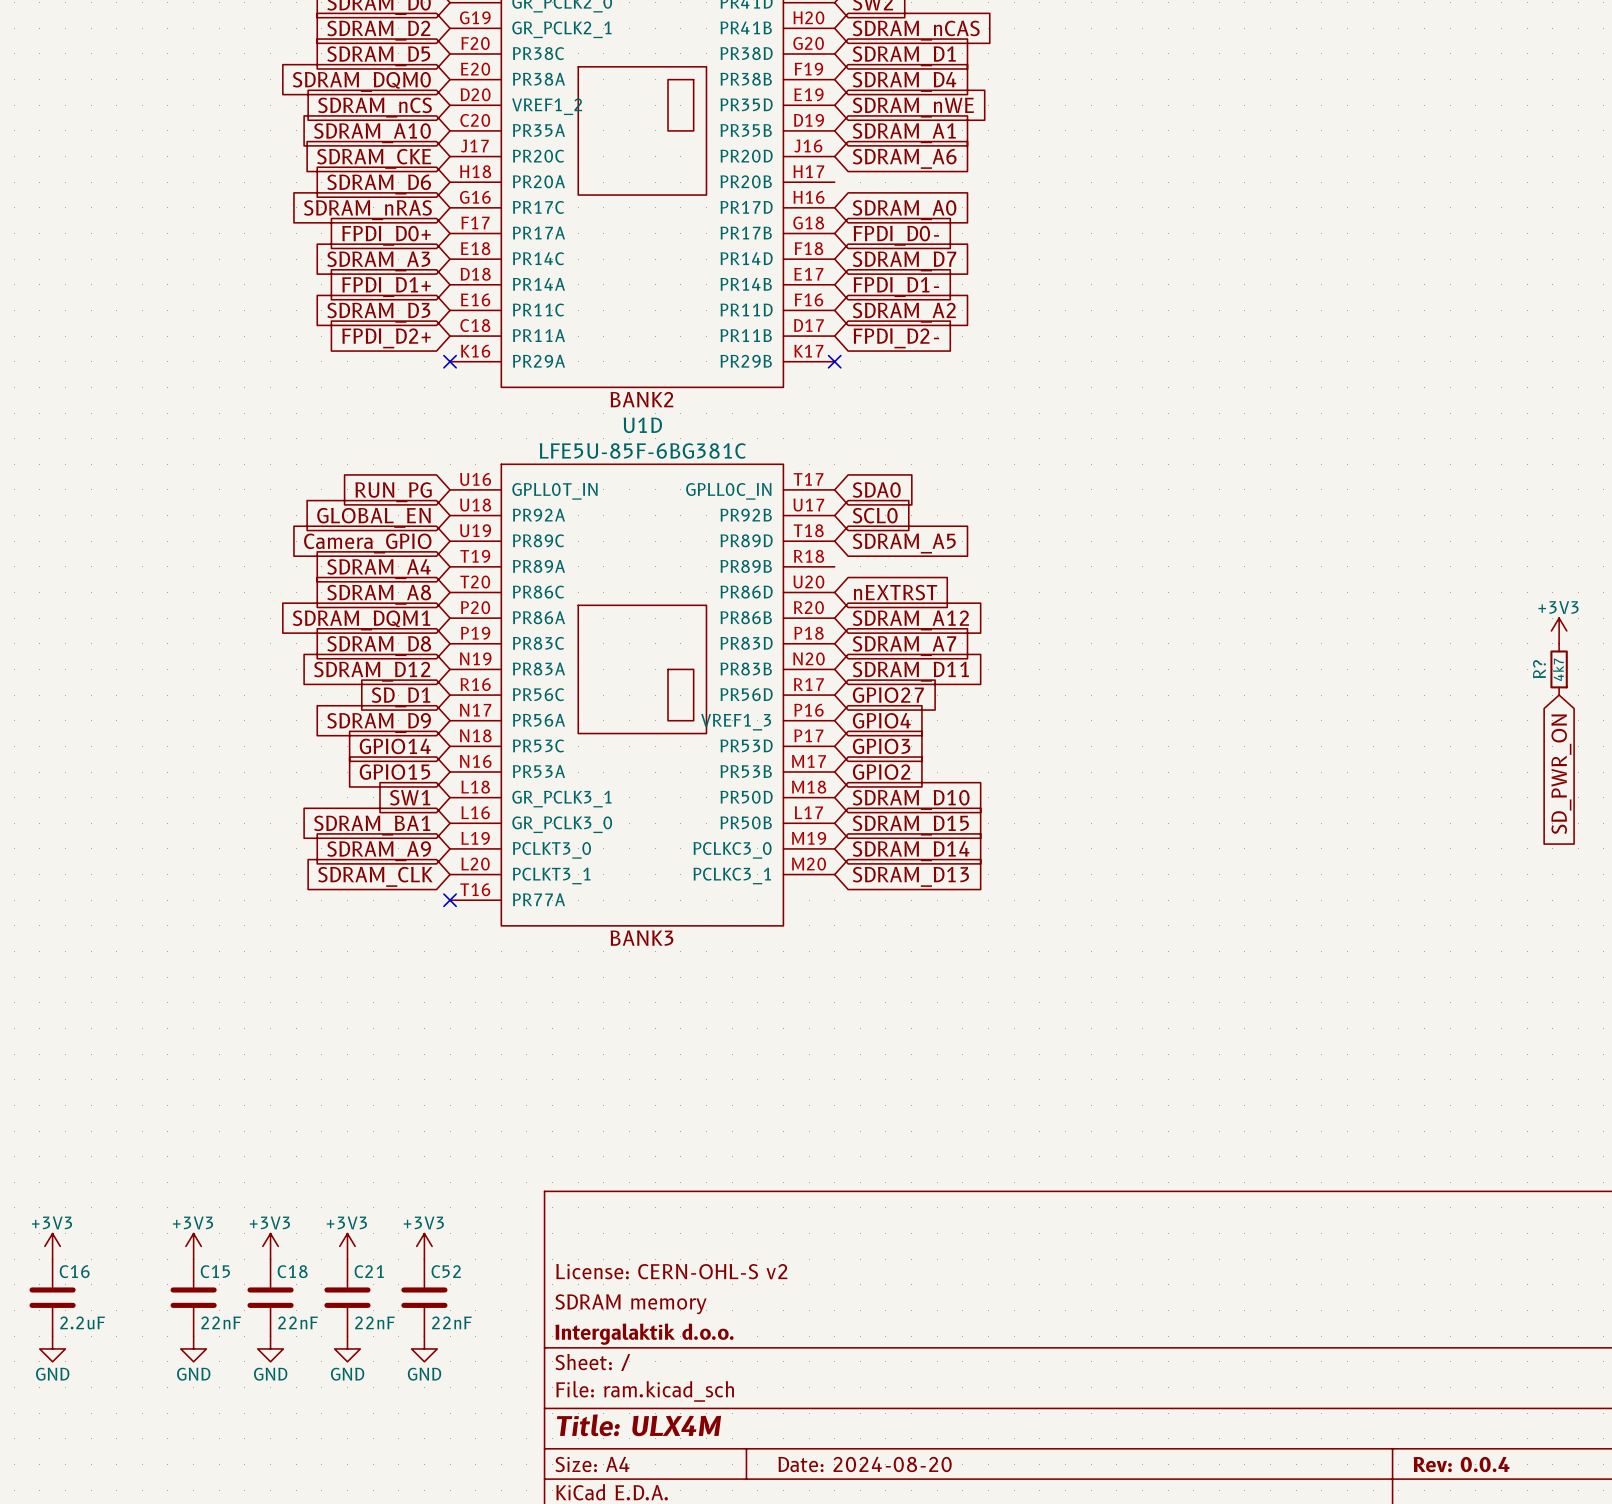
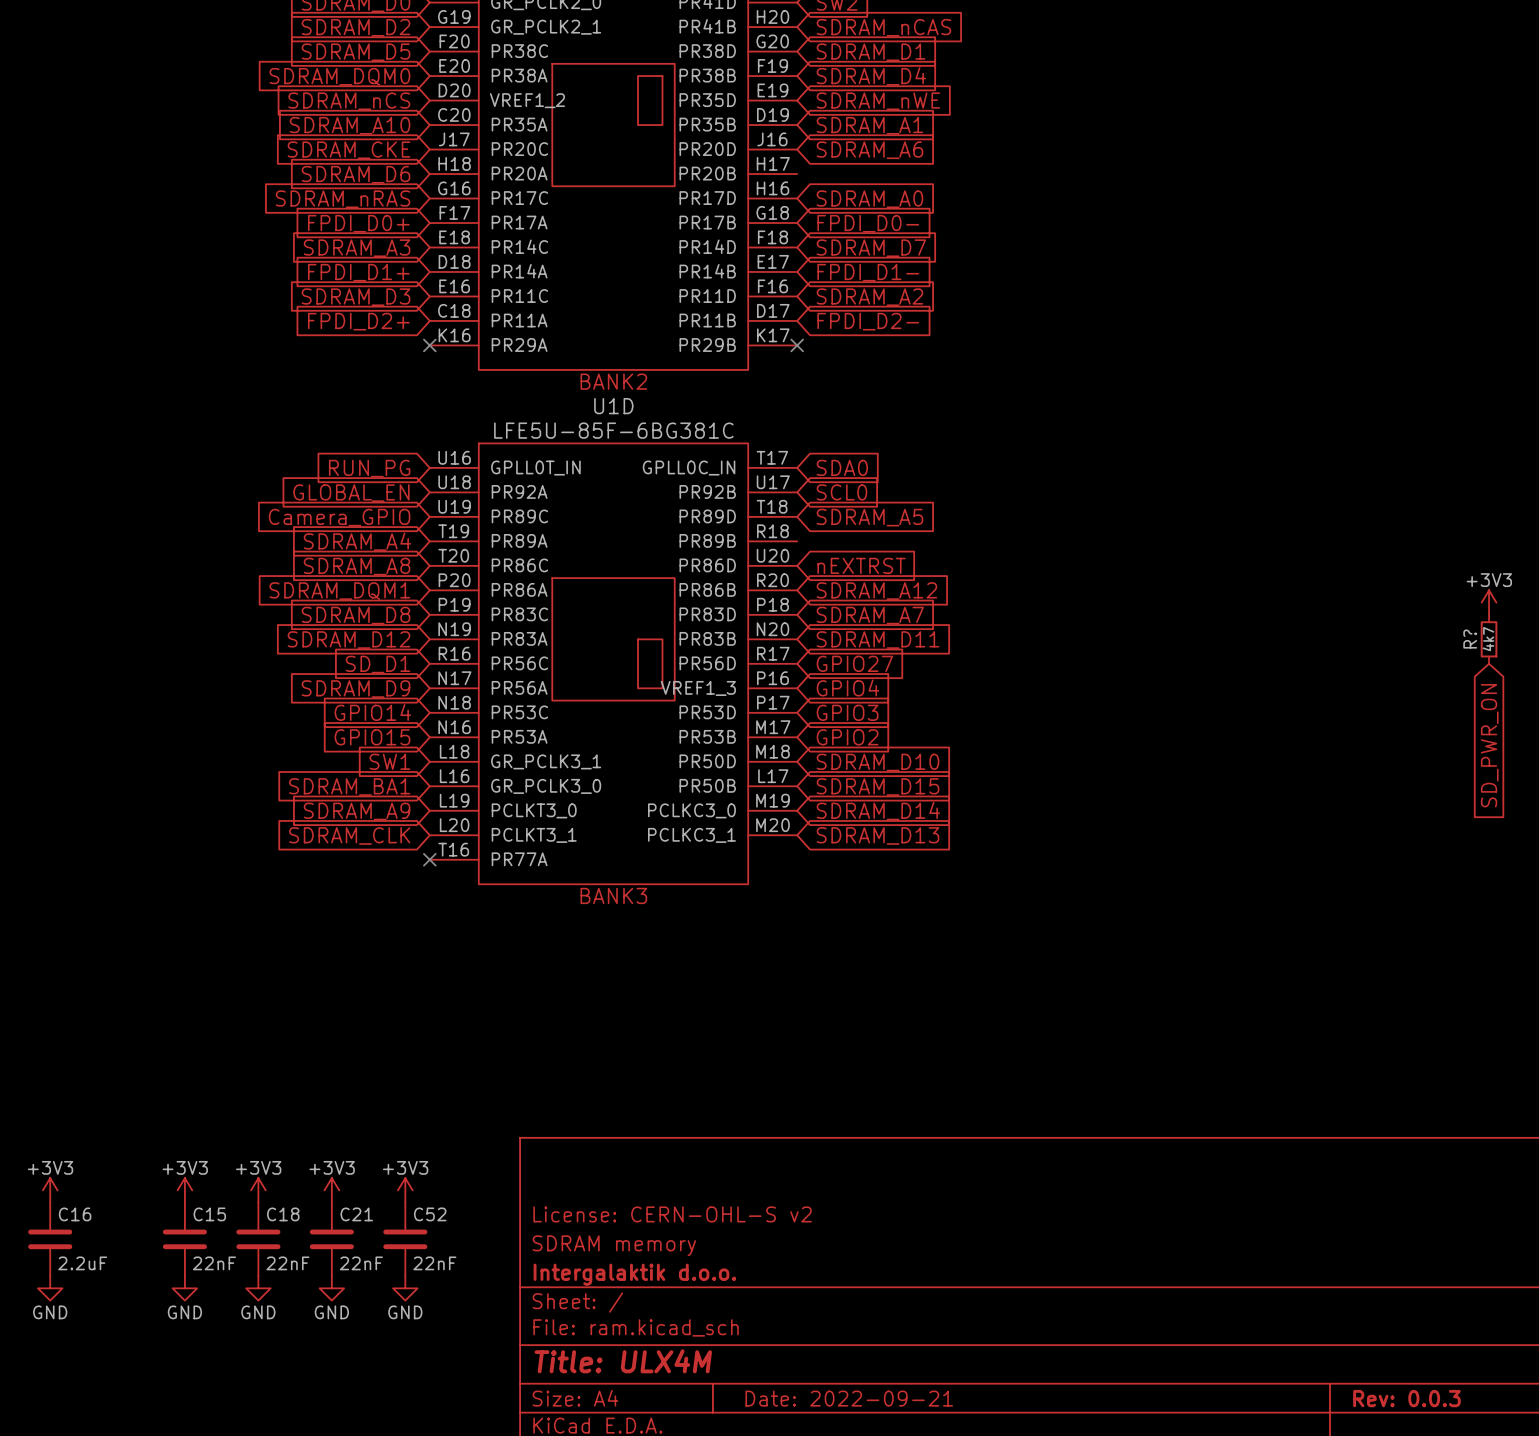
title block: Date: 2024-08-20 (865, 1464) -> Date: 2022-09-21 (849, 1398)
title block: Rev: 0.0.4 (1461, 1464) -> Rev: 0.0.3 (1406, 1398)

